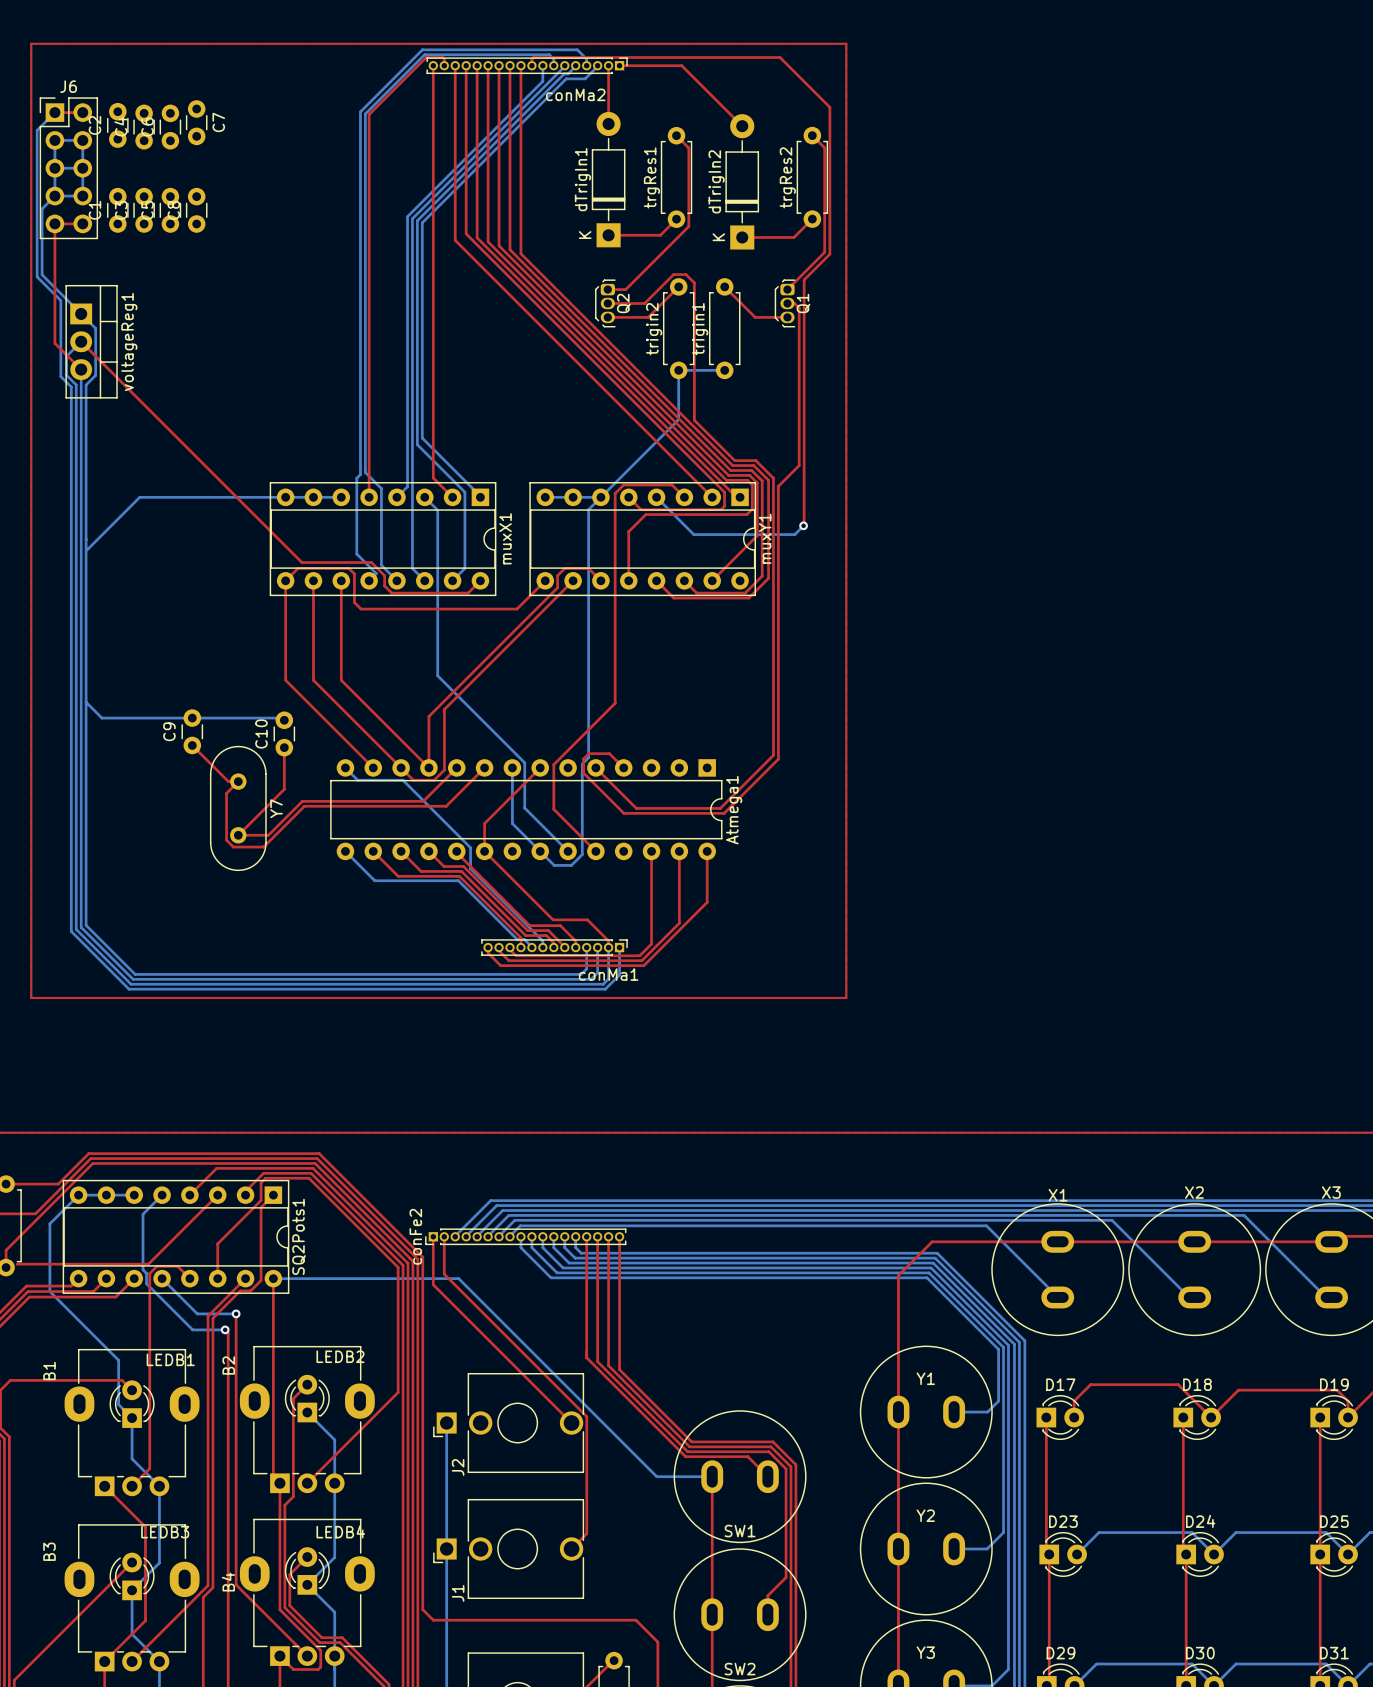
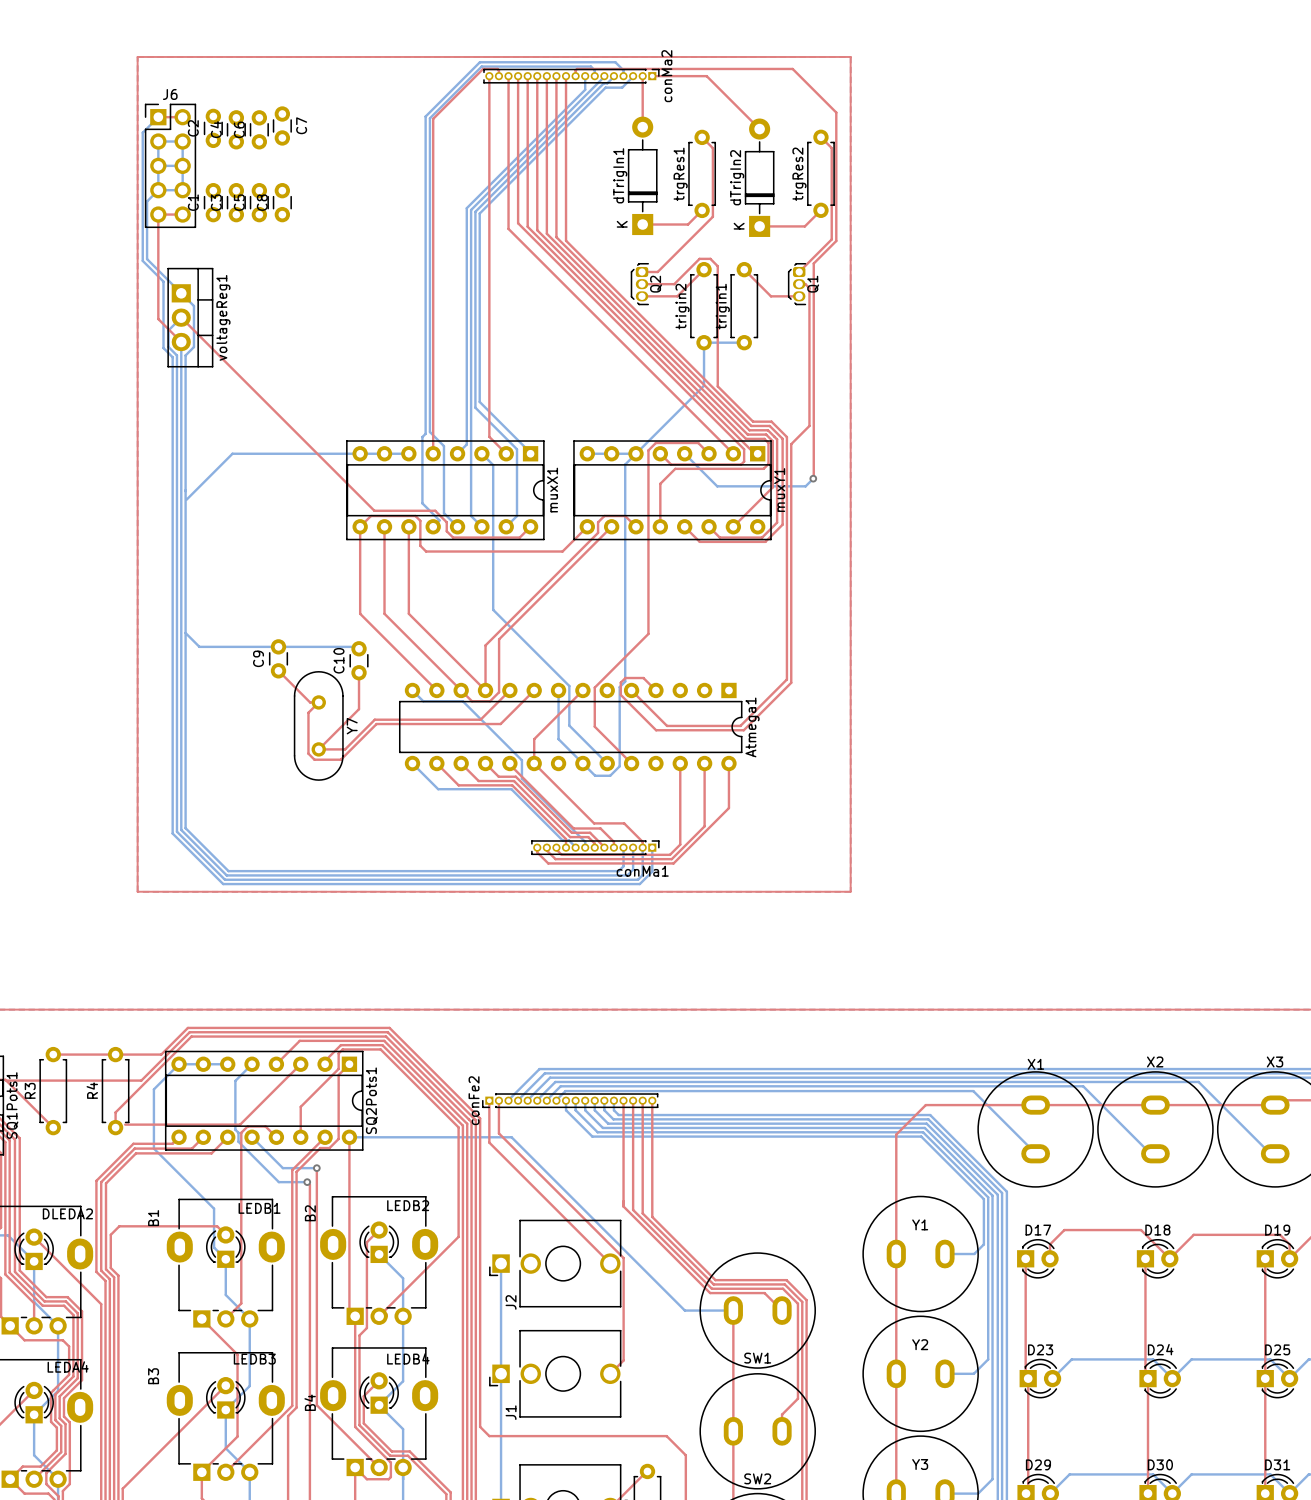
conMa2 name rotation: 0° (575, 94) -> 90° counterclockwise (666, 76)

